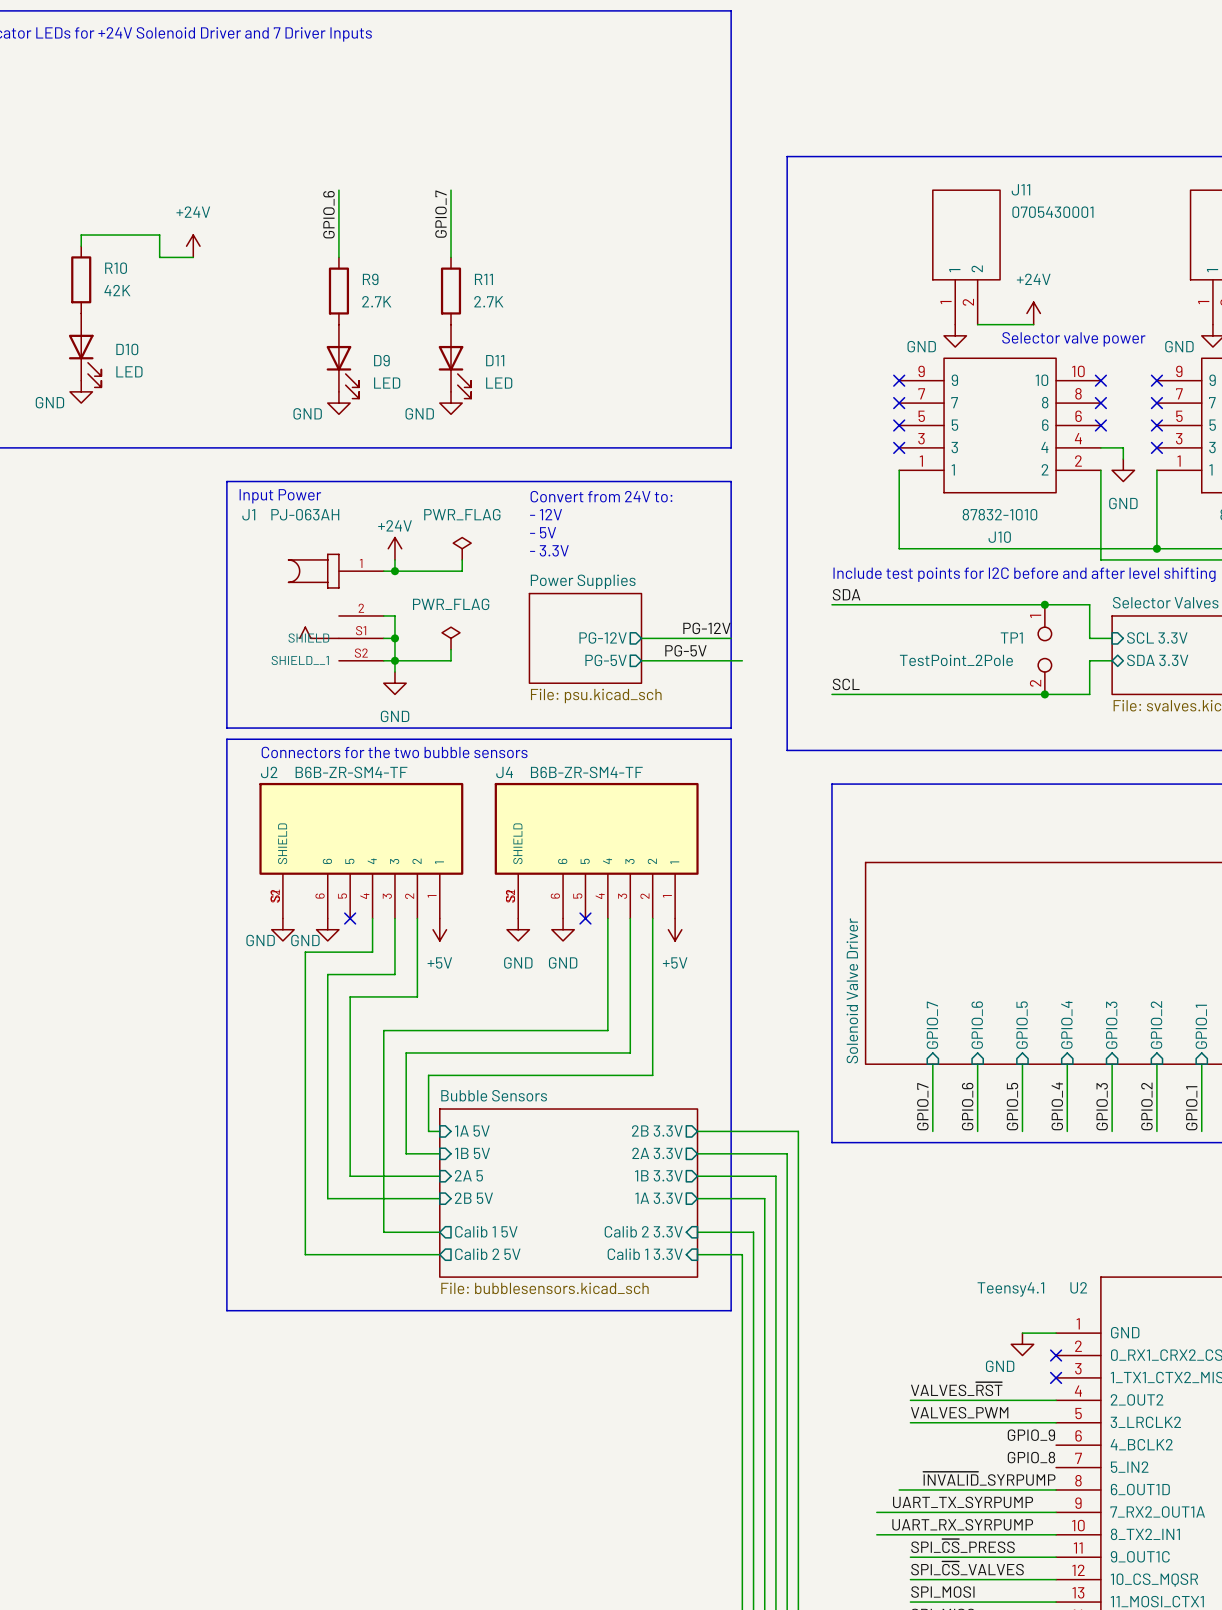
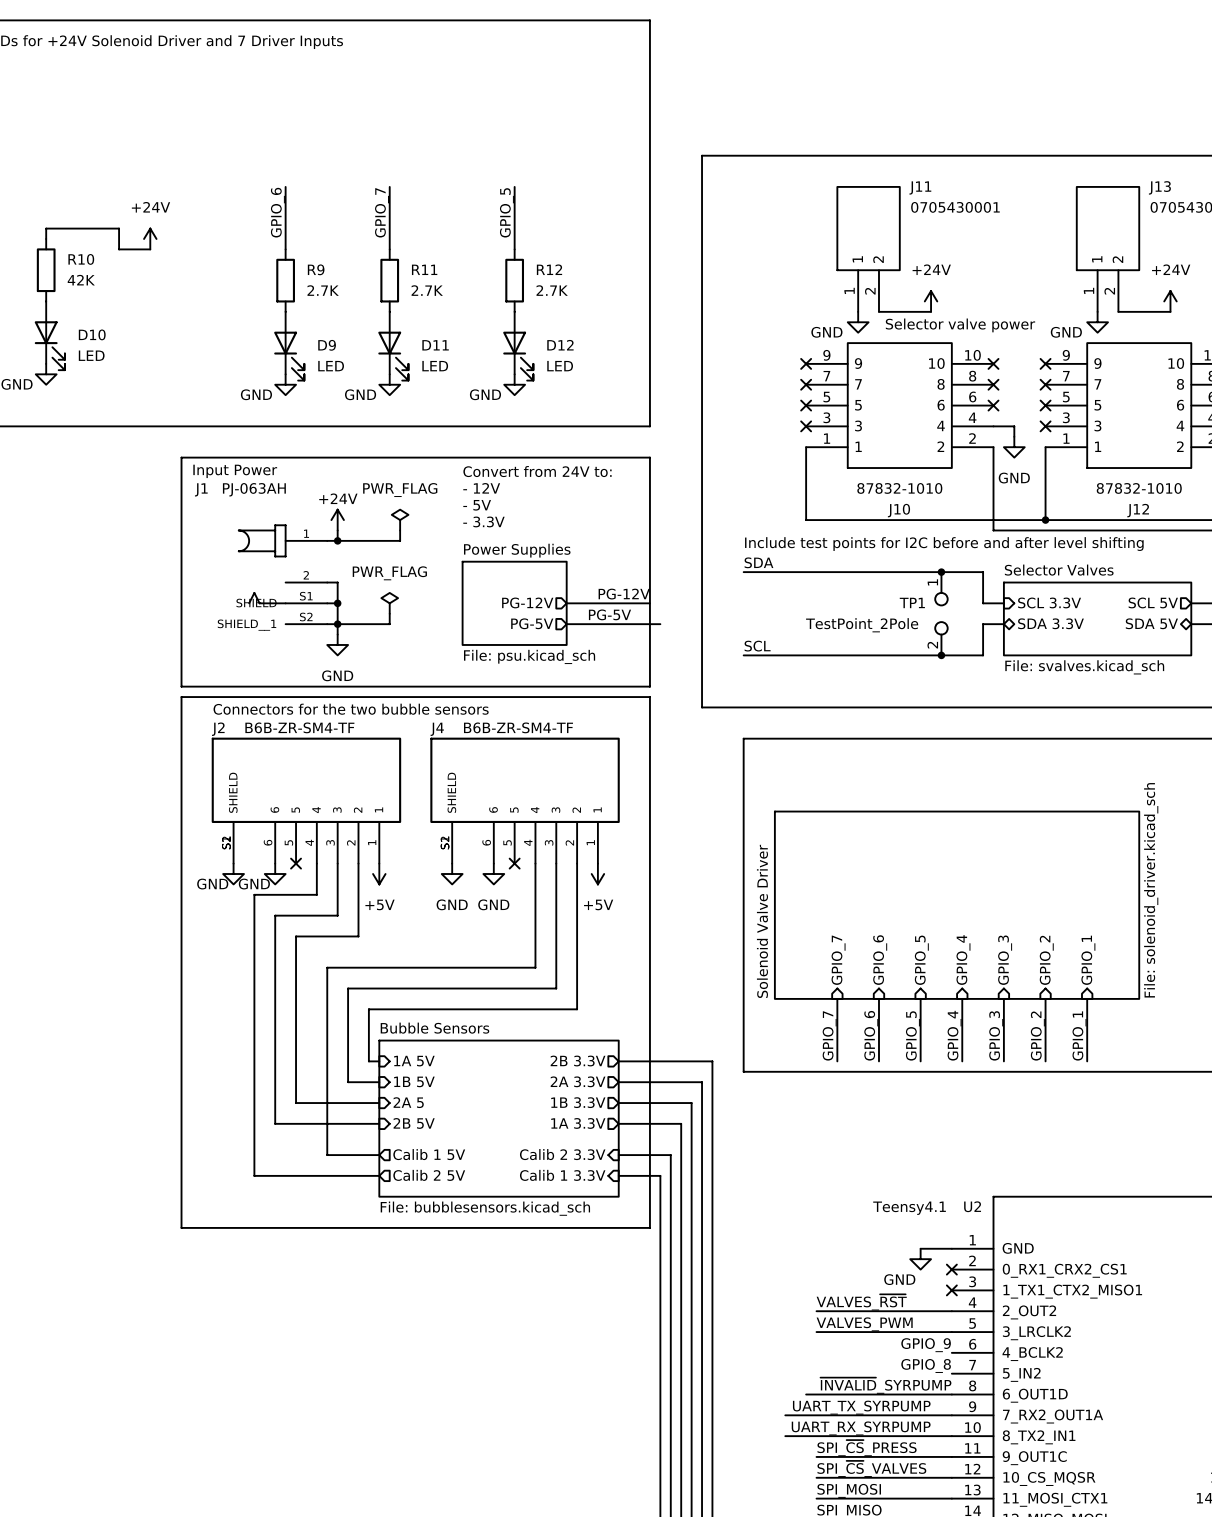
wire: none -> (514, 186) (514, 249)
label: none -> GPIO_5 (506, 212)
R12: none -> 2.7K (514, 280)
D12: none -> LED (518, 346)
power symbol: none -> GND (514, 384)

